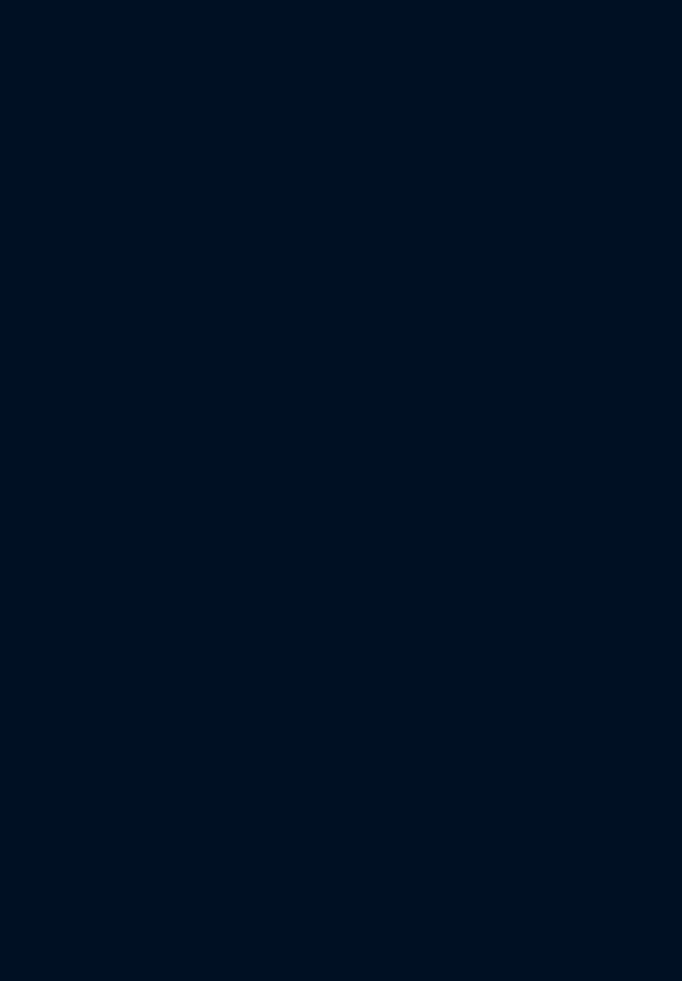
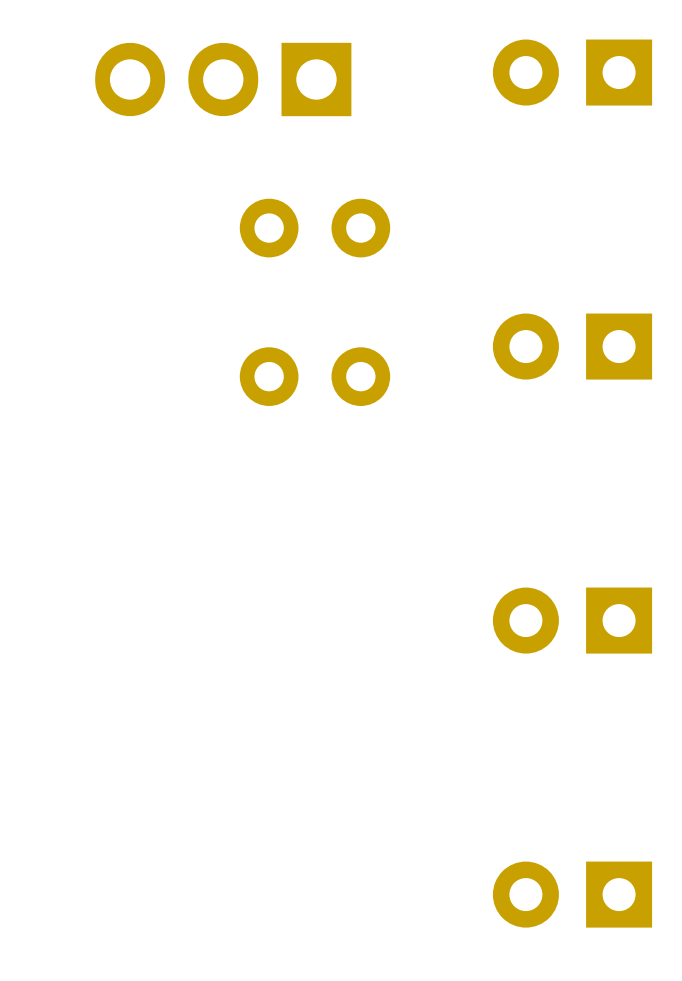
part: none -> (572, 72)
part: none -> (223, 79)
part: none -> (314, 228)
part: none -> (572, 346)
part: none -> (314, 376)
part: none -> (572, 620)
part: none -> (572, 894)

